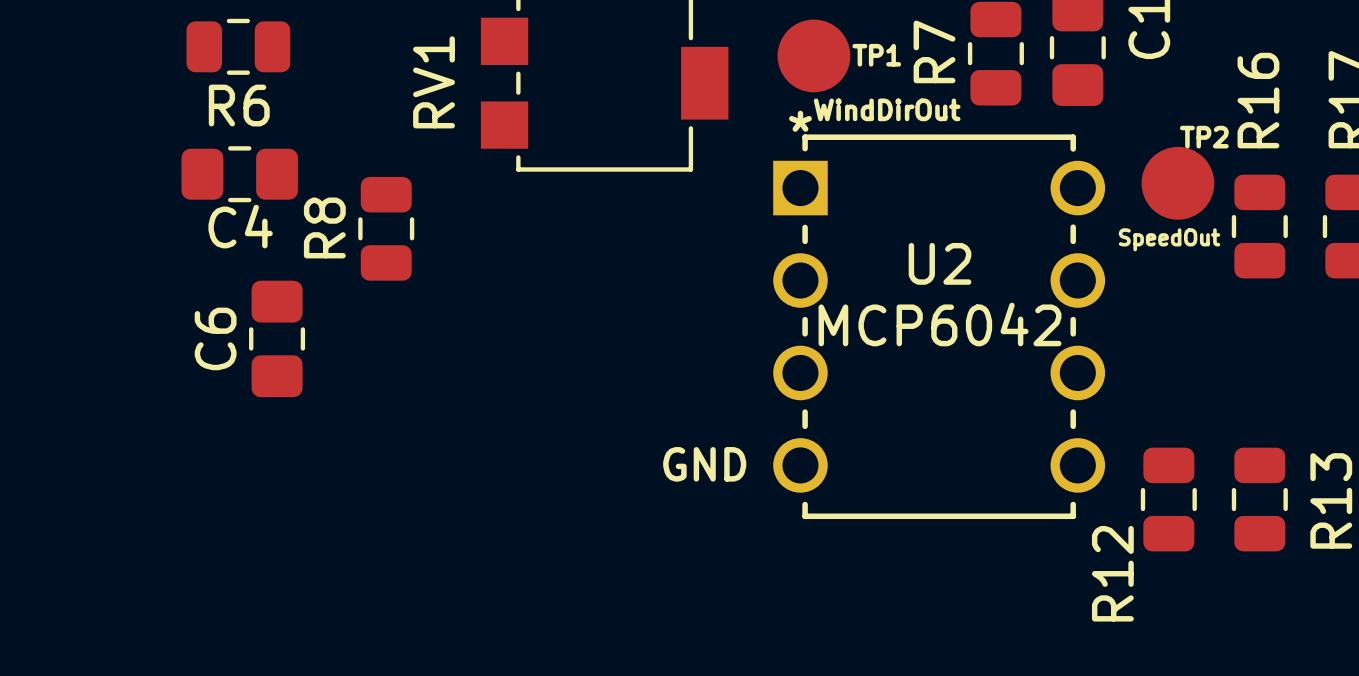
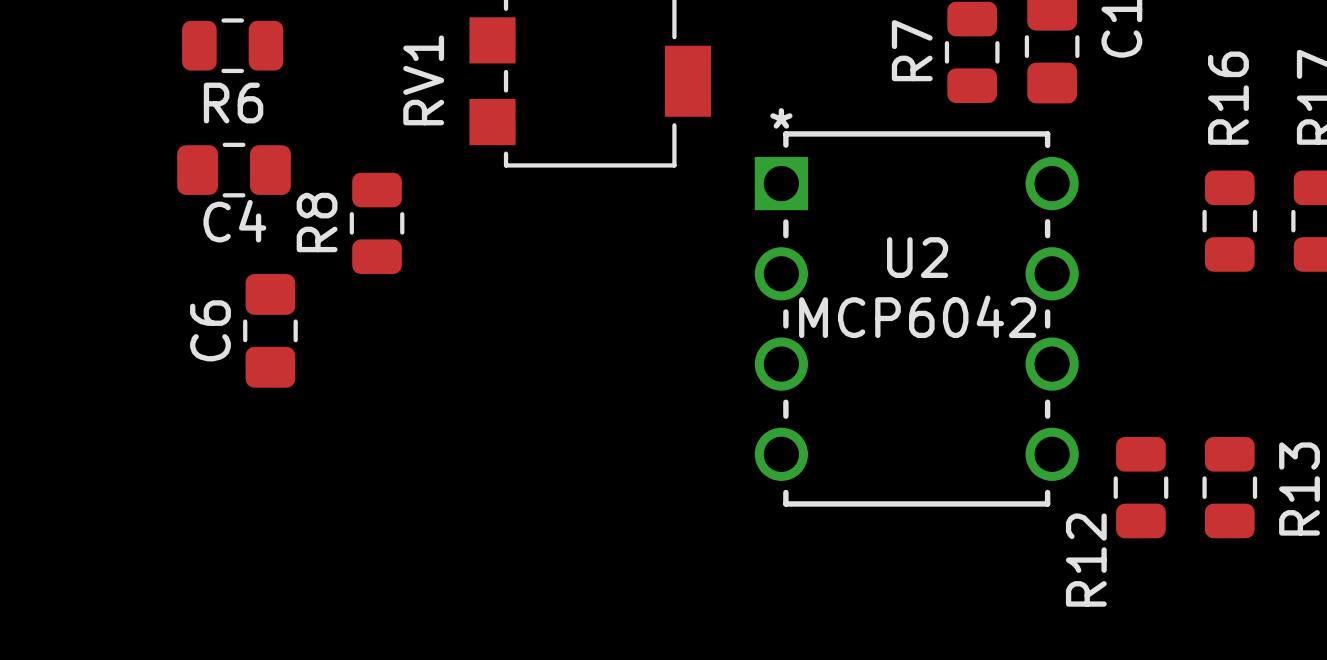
TP1: (813, 55) -> none
text: WindDirOut (887, 109) -> none
TP2: (1177, 183) -> none
text: SpeedOut (1169, 239) -> none
text: GND (704, 464) -> none

